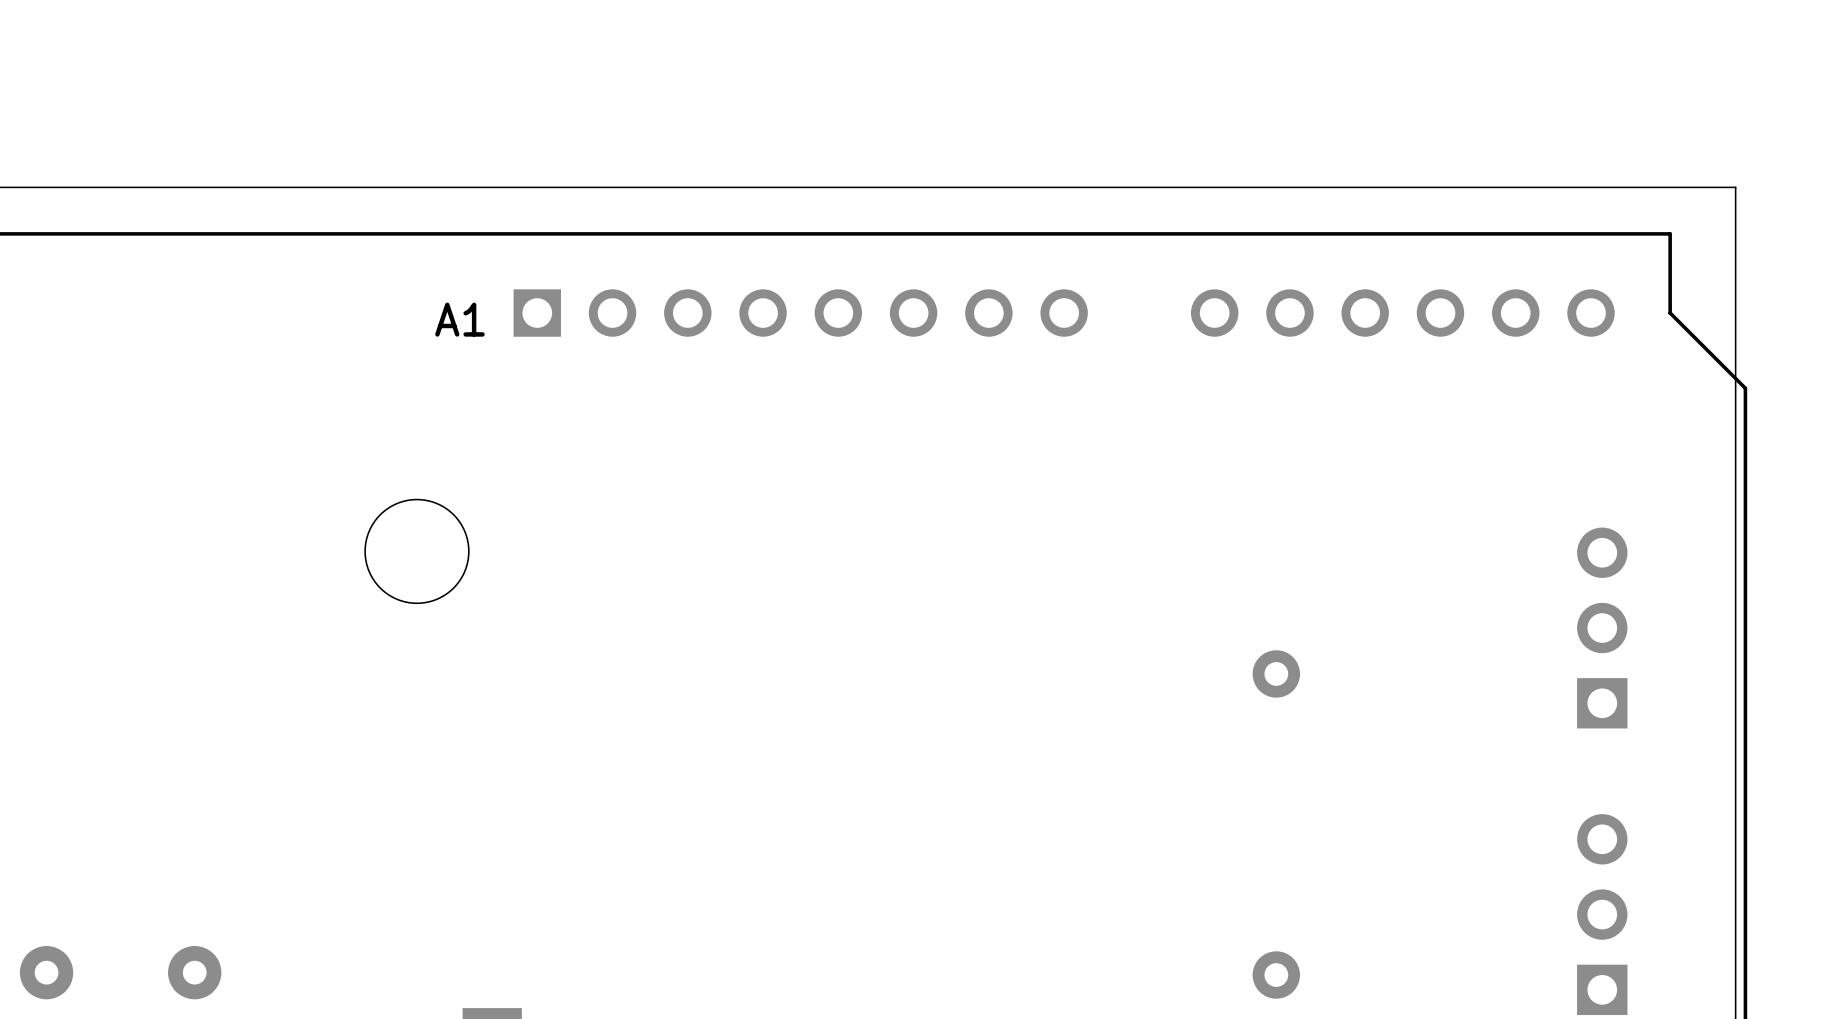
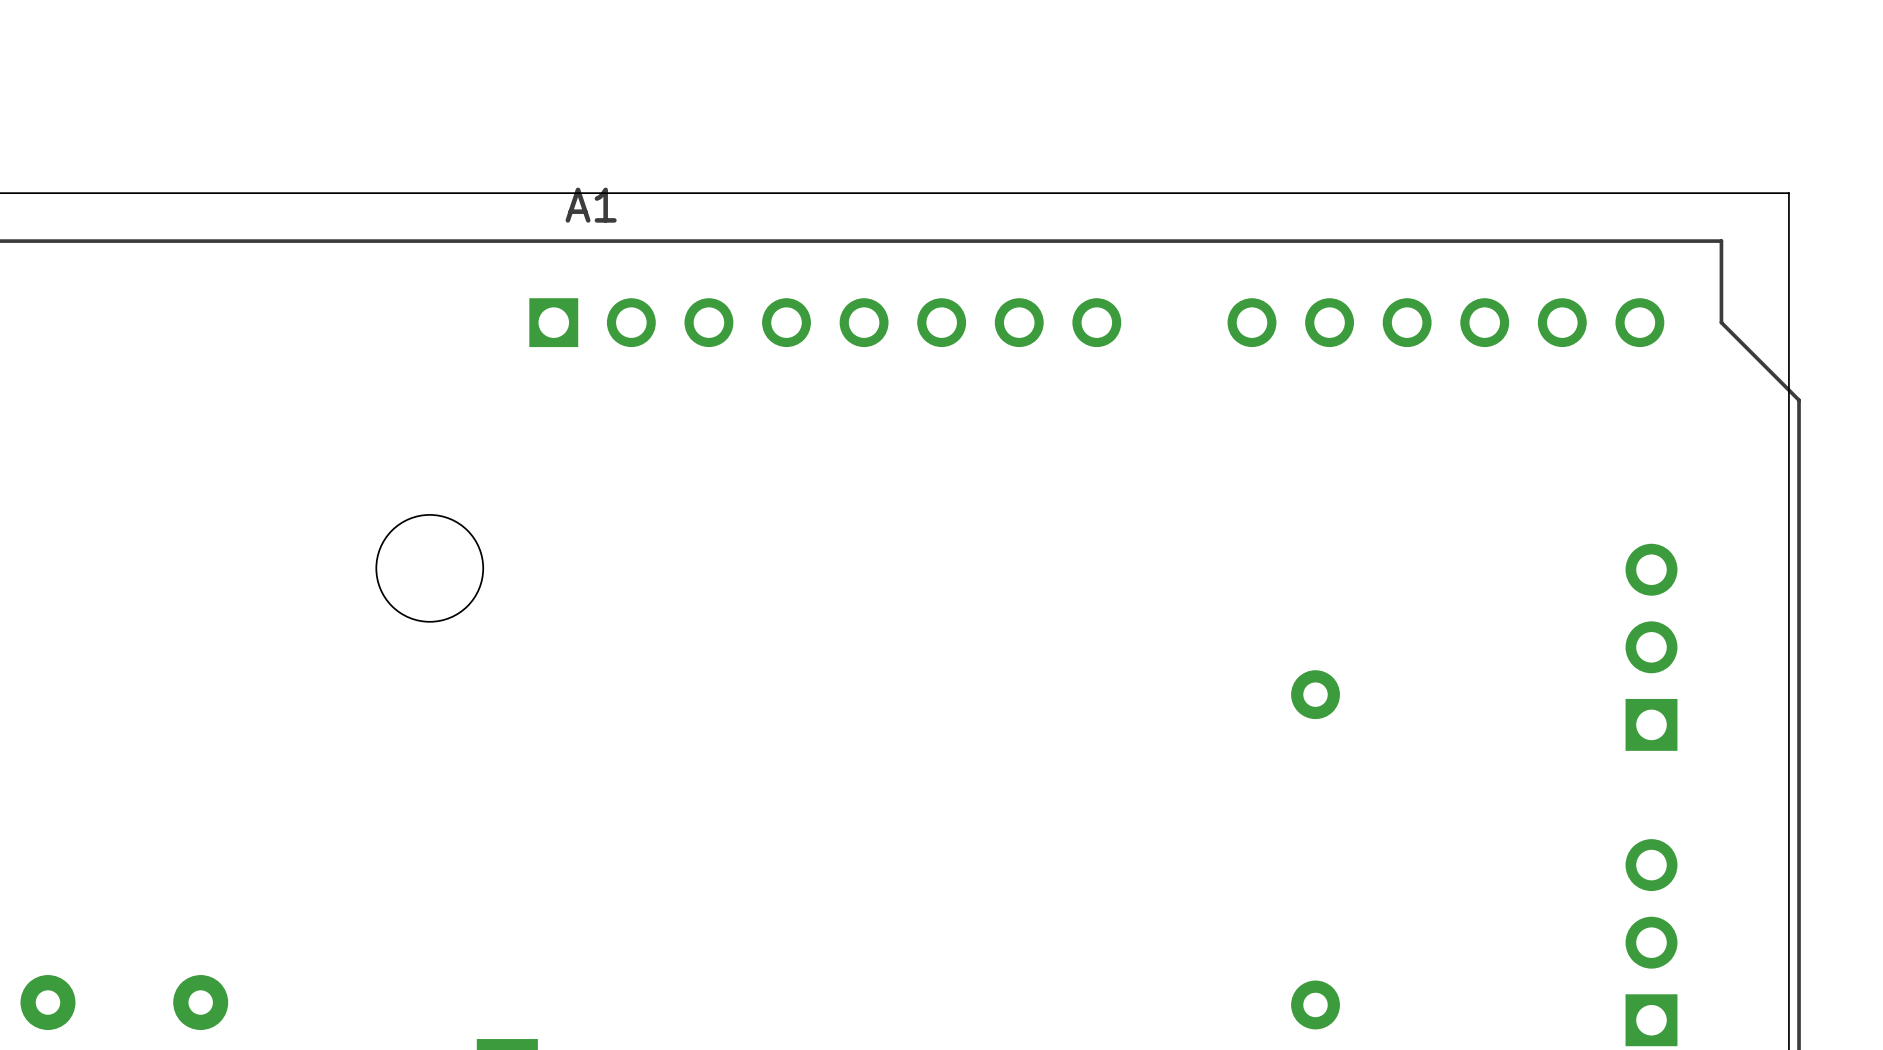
A1 name position: A1 (460, 319) -> A1 (591, 205)

